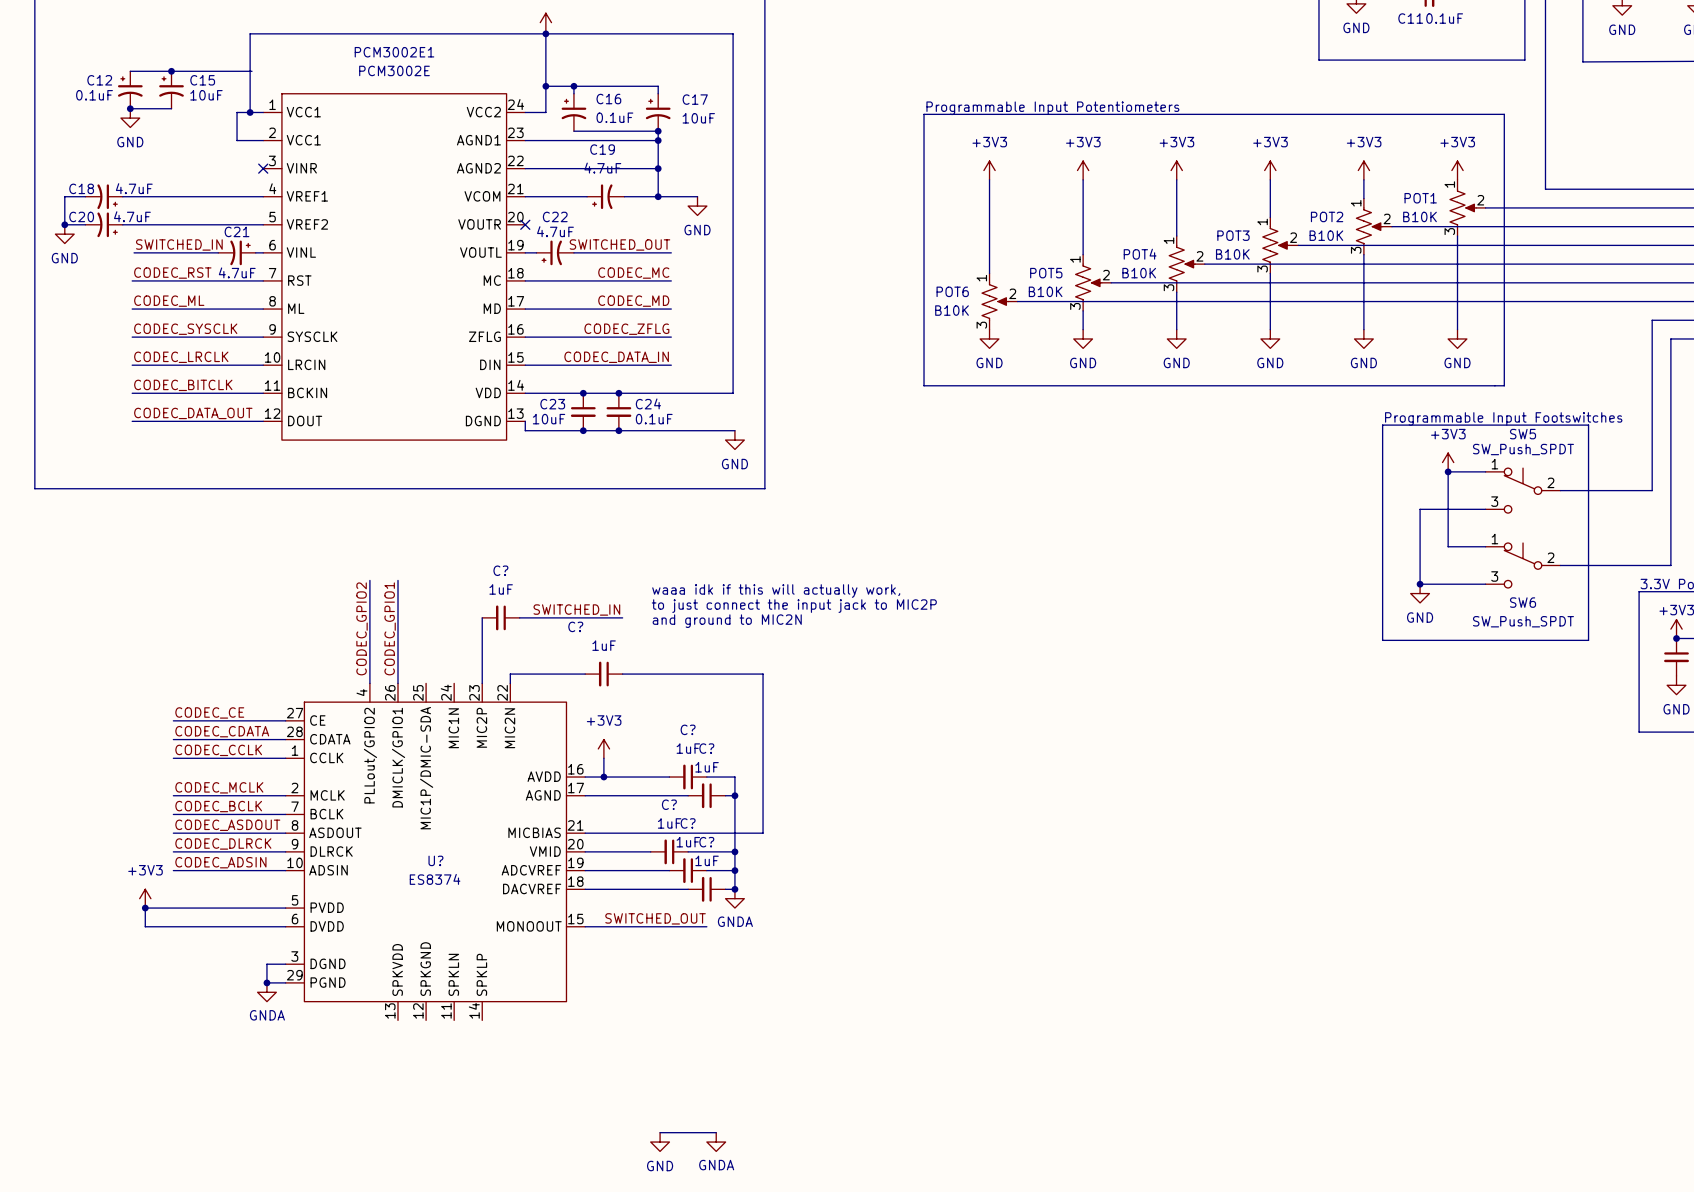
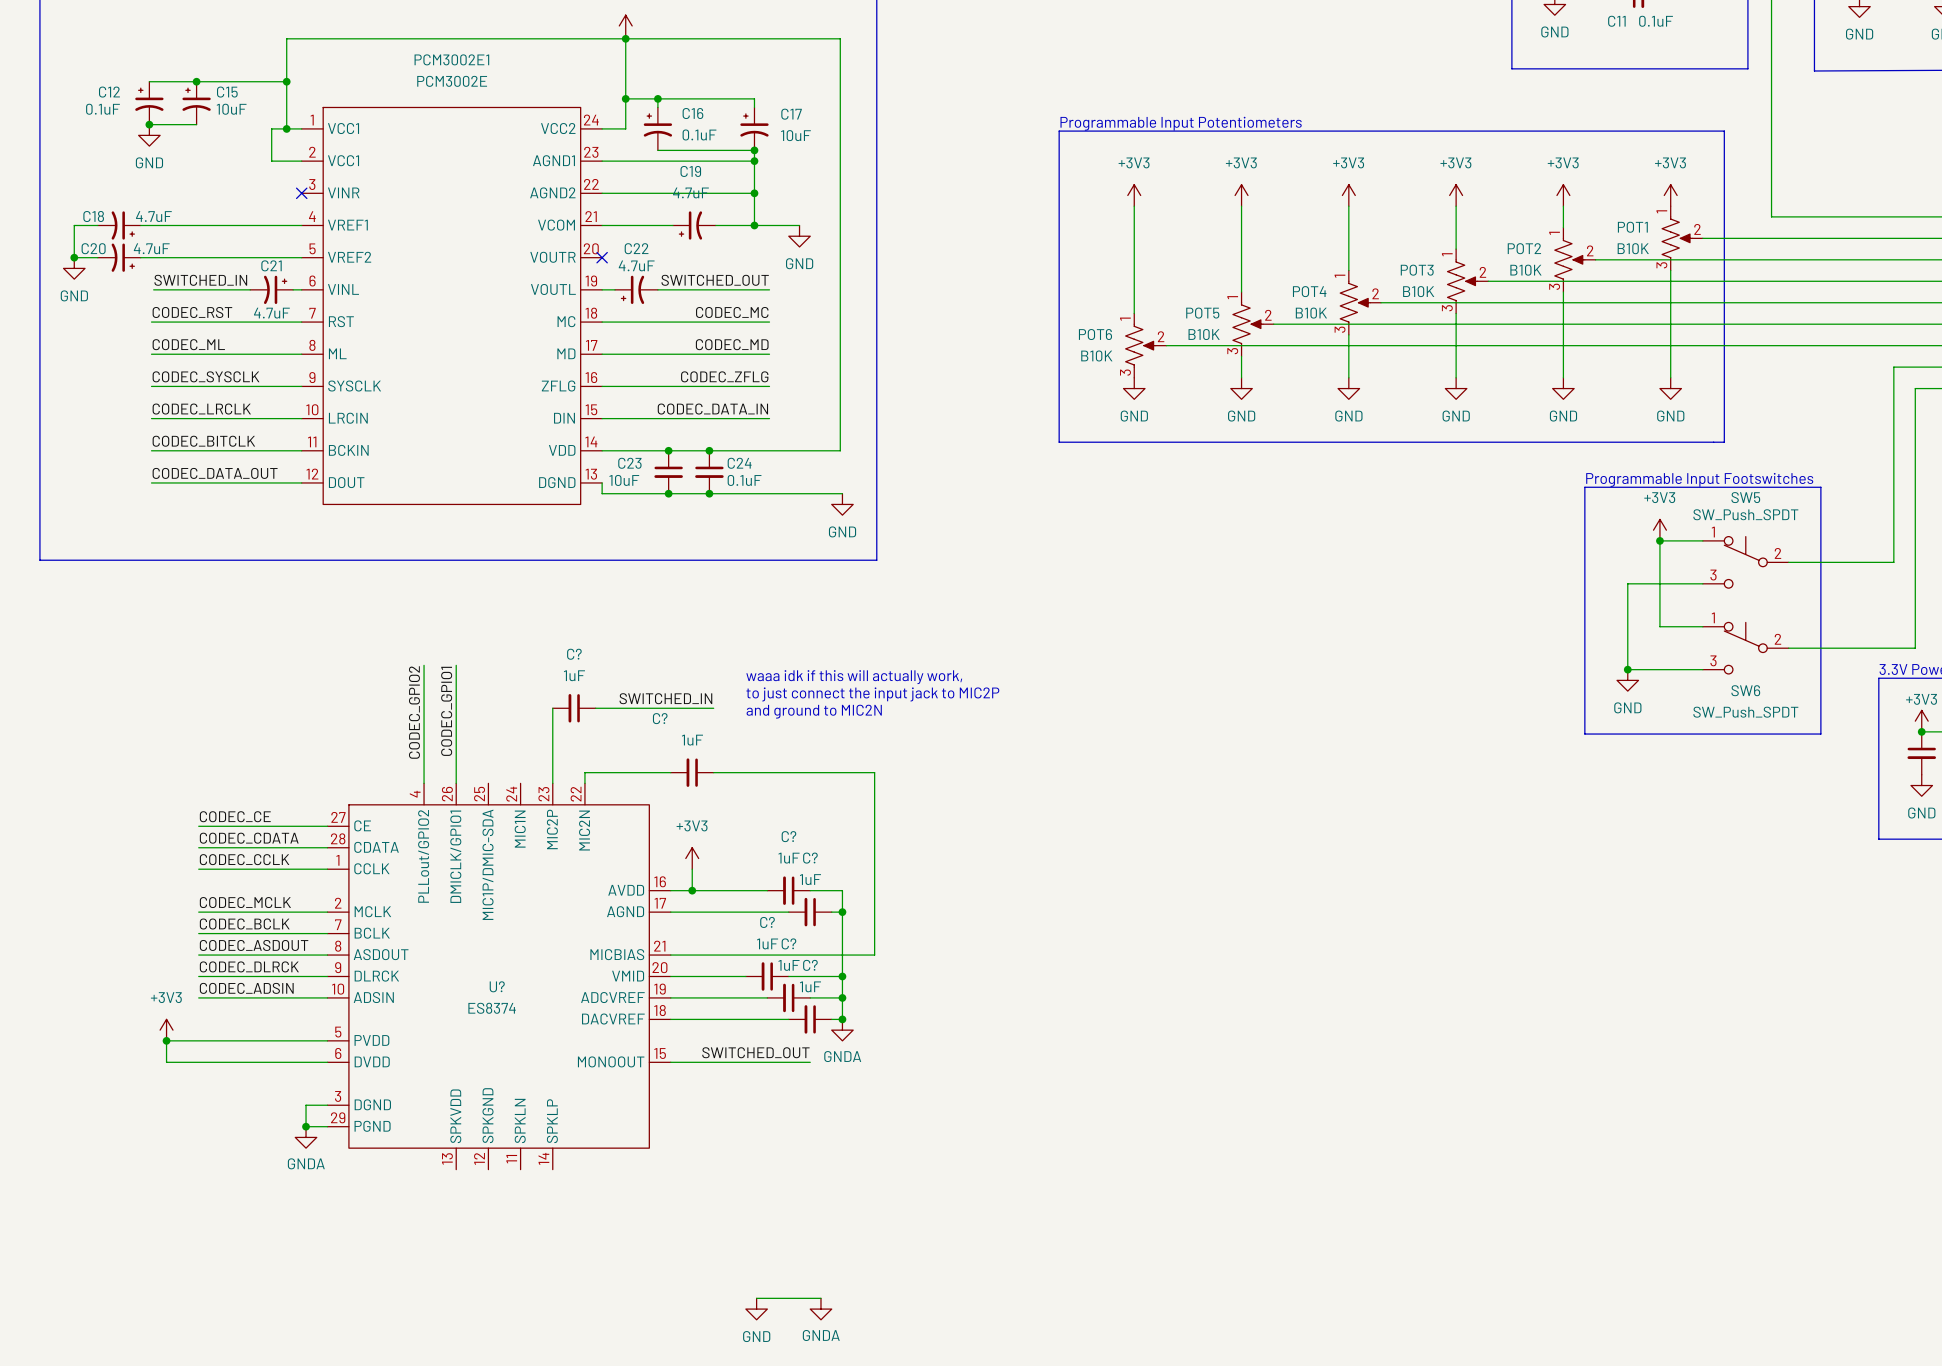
junction: none -> (286, 81)

